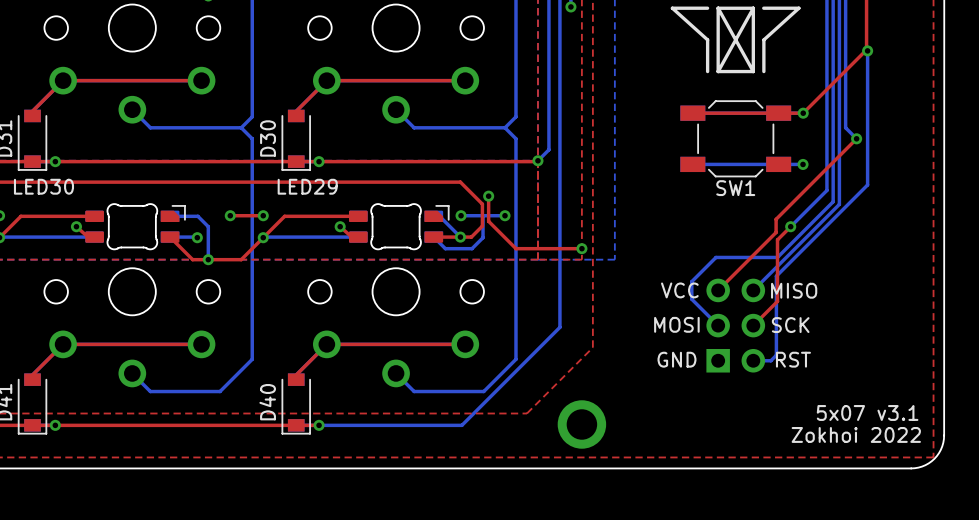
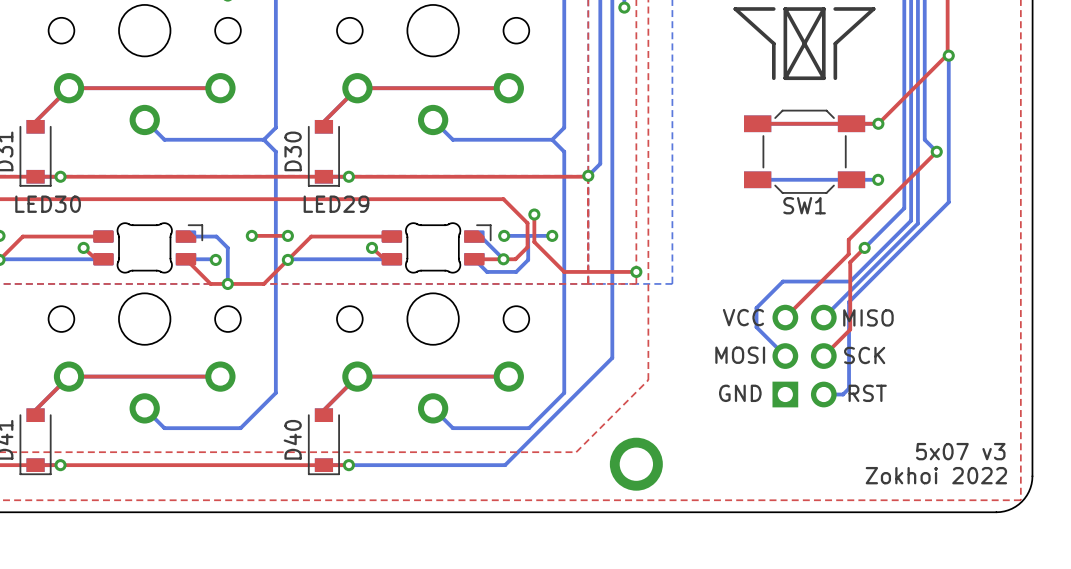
text: 5x07 v3.1 (867, 412) -> 5x07 v3 (960, 451)

